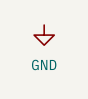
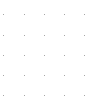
power symbol: GND (44, 35) -> none

